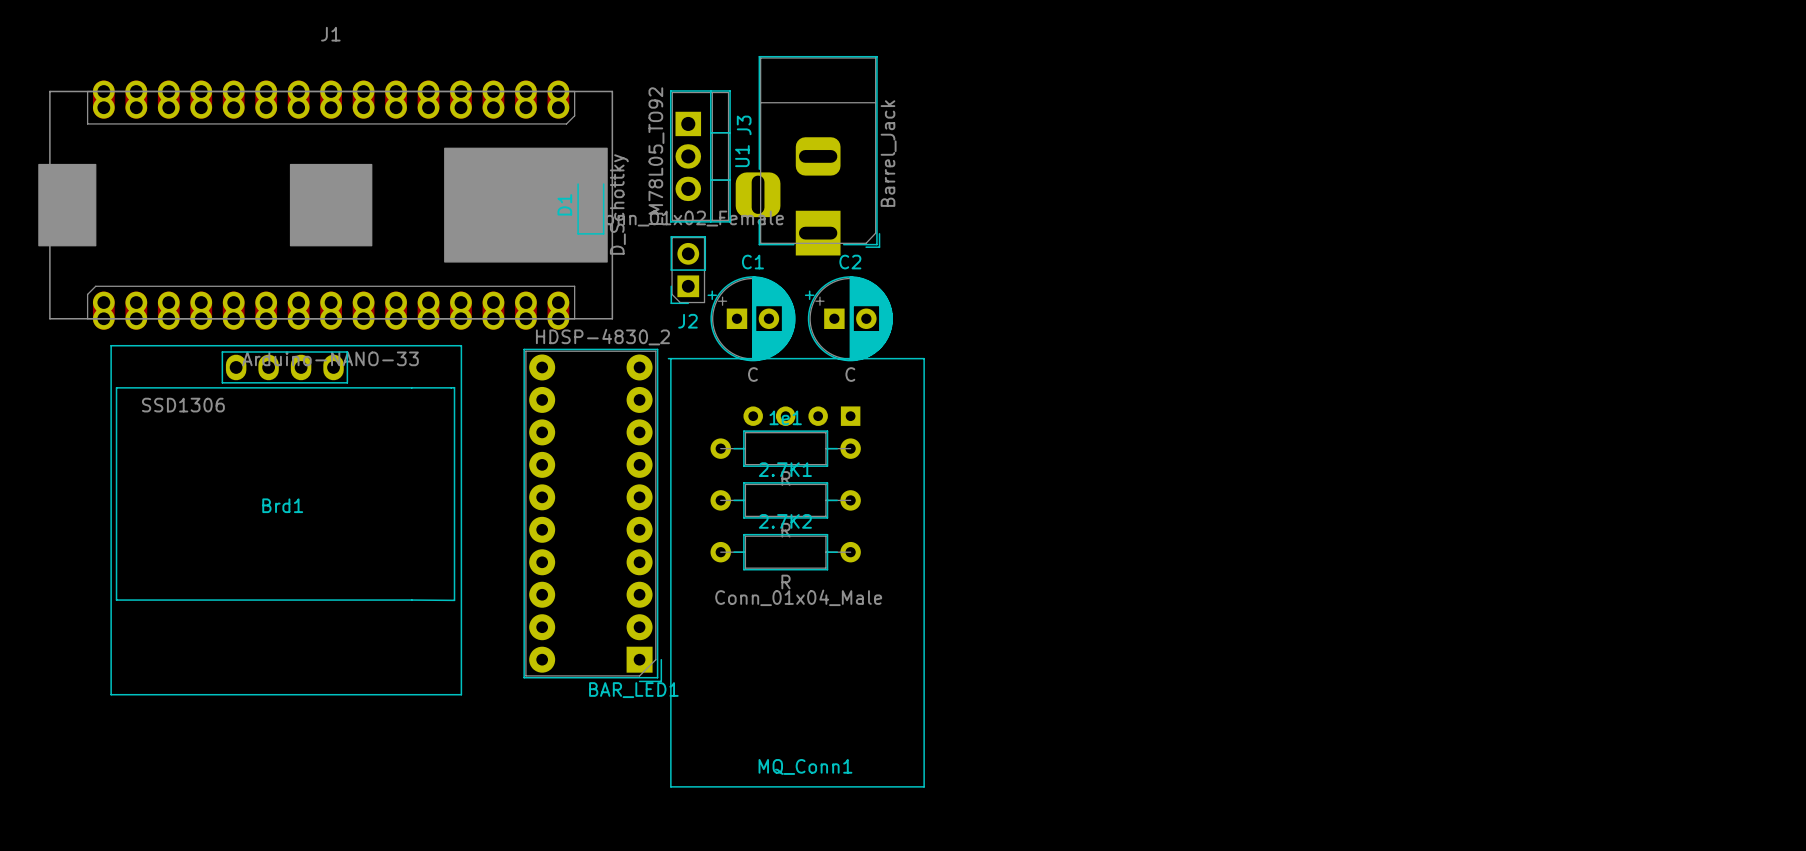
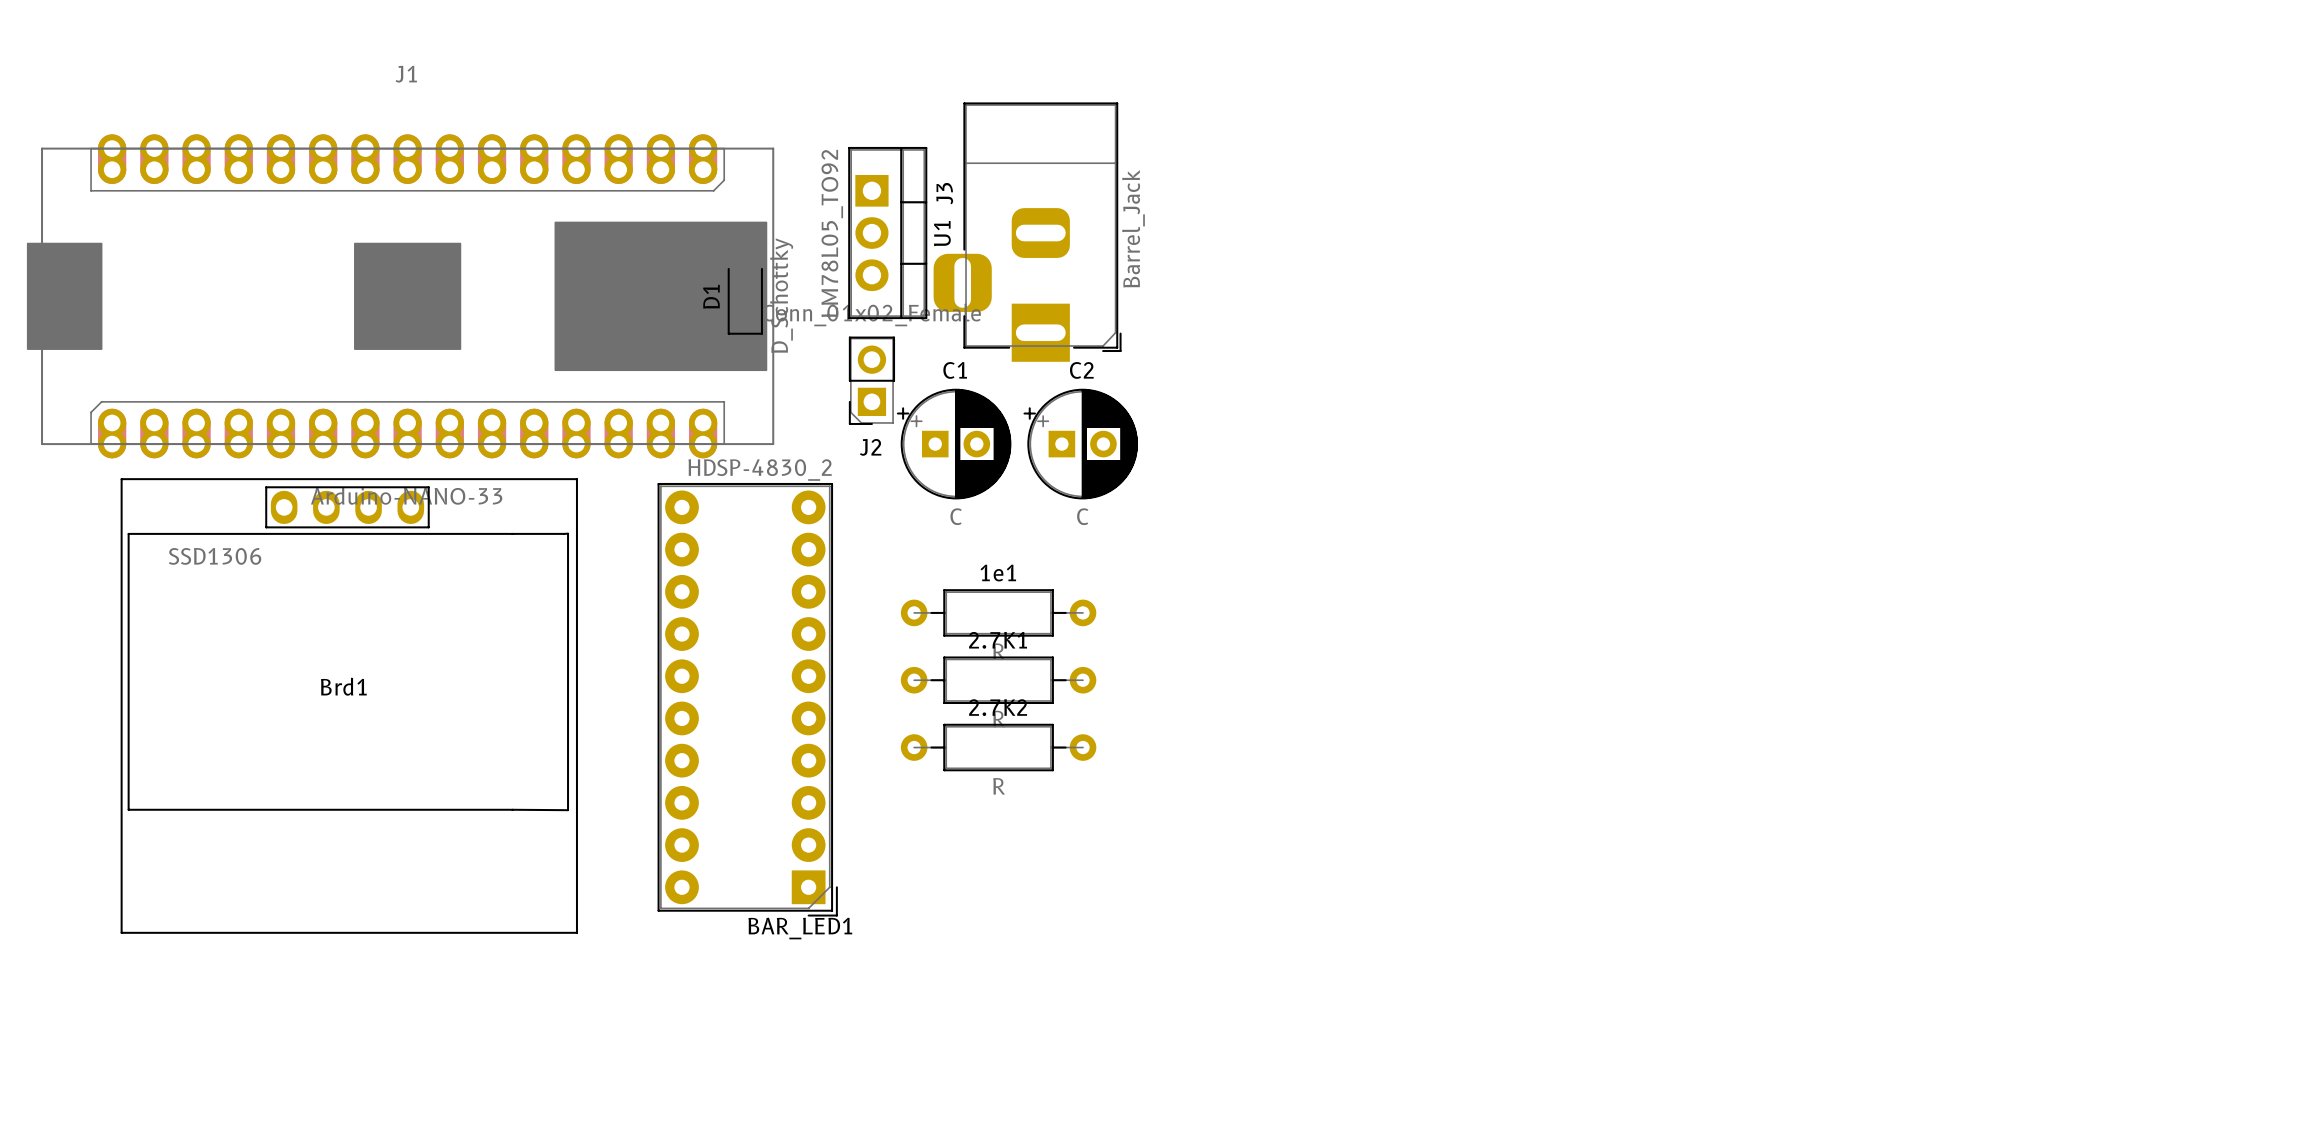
MQ_Conn1: Conn_01x04_Male (796, 572) -> none

